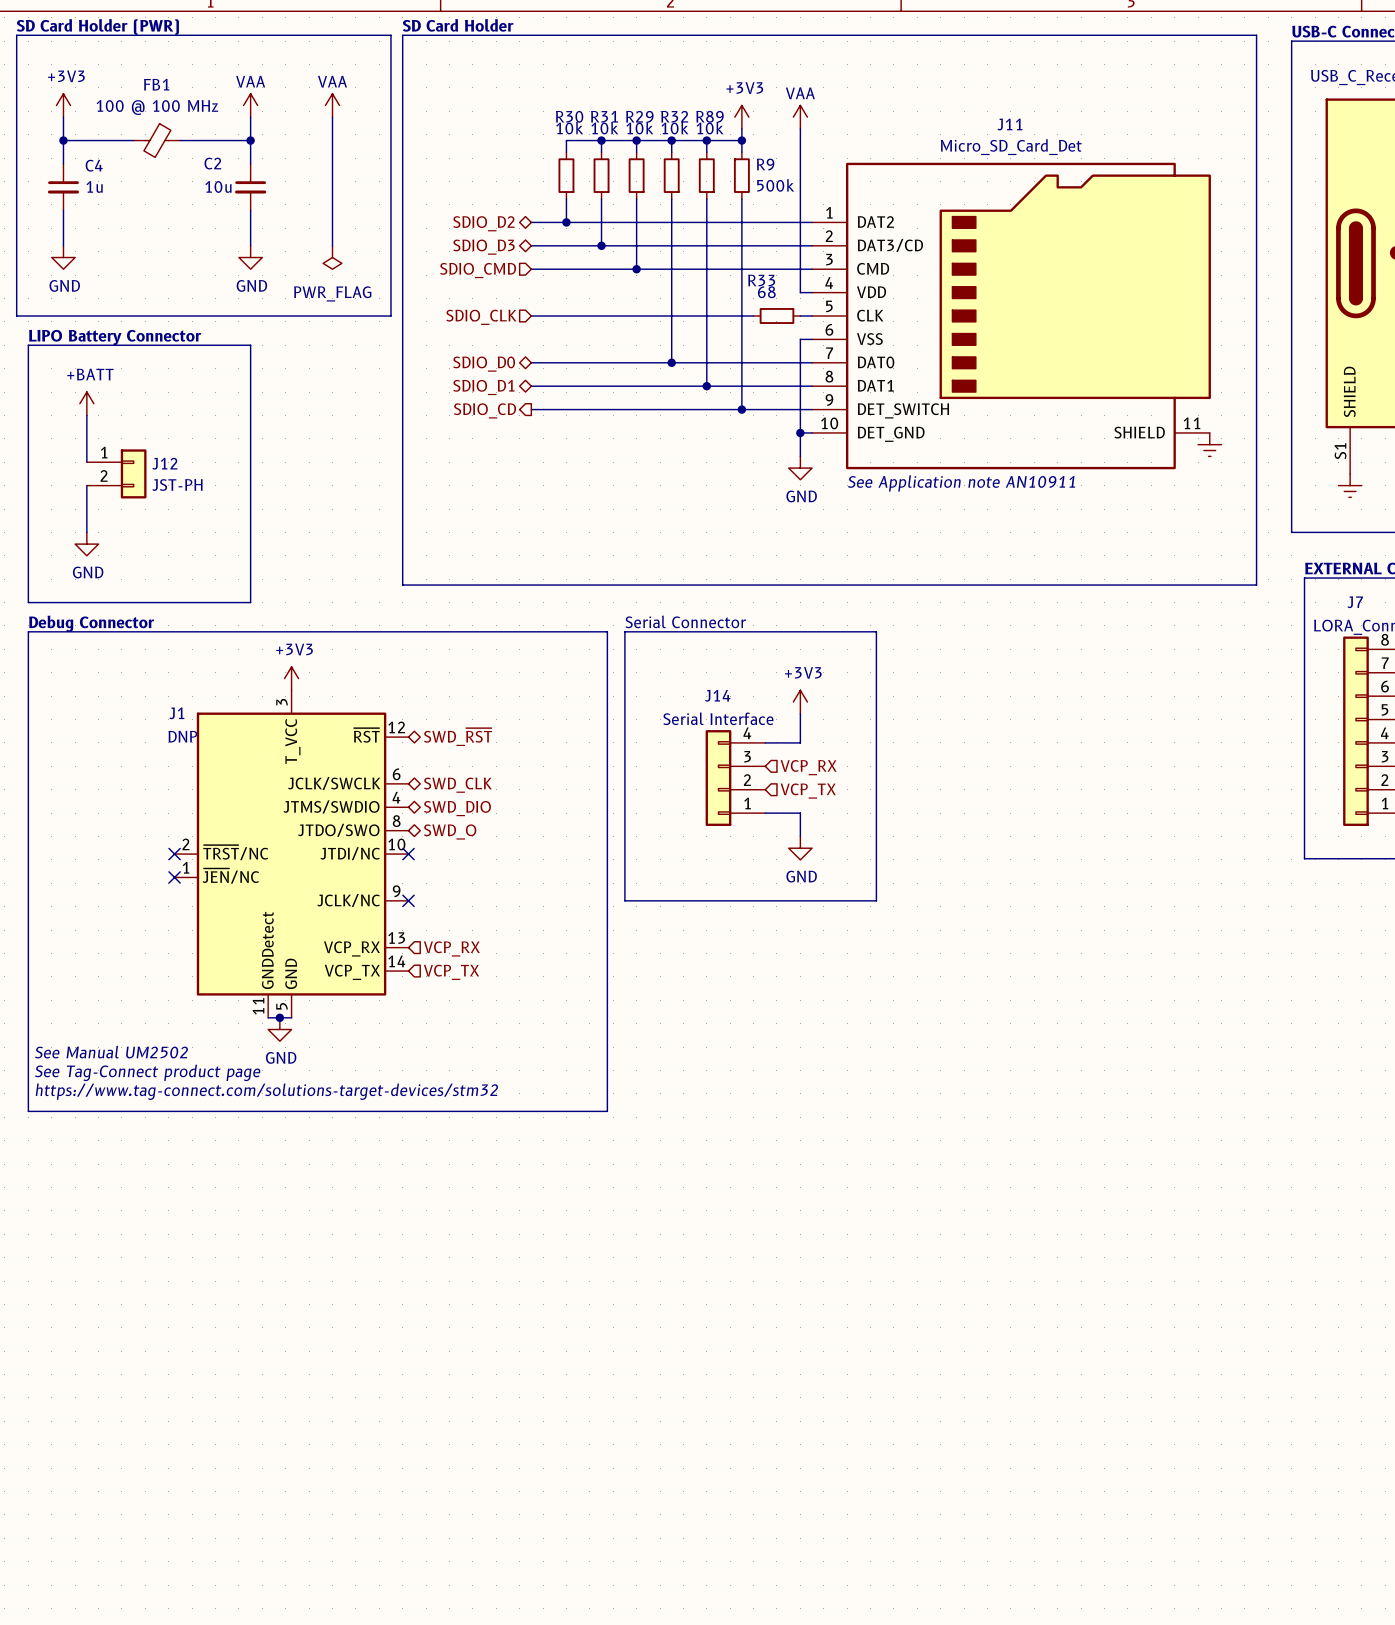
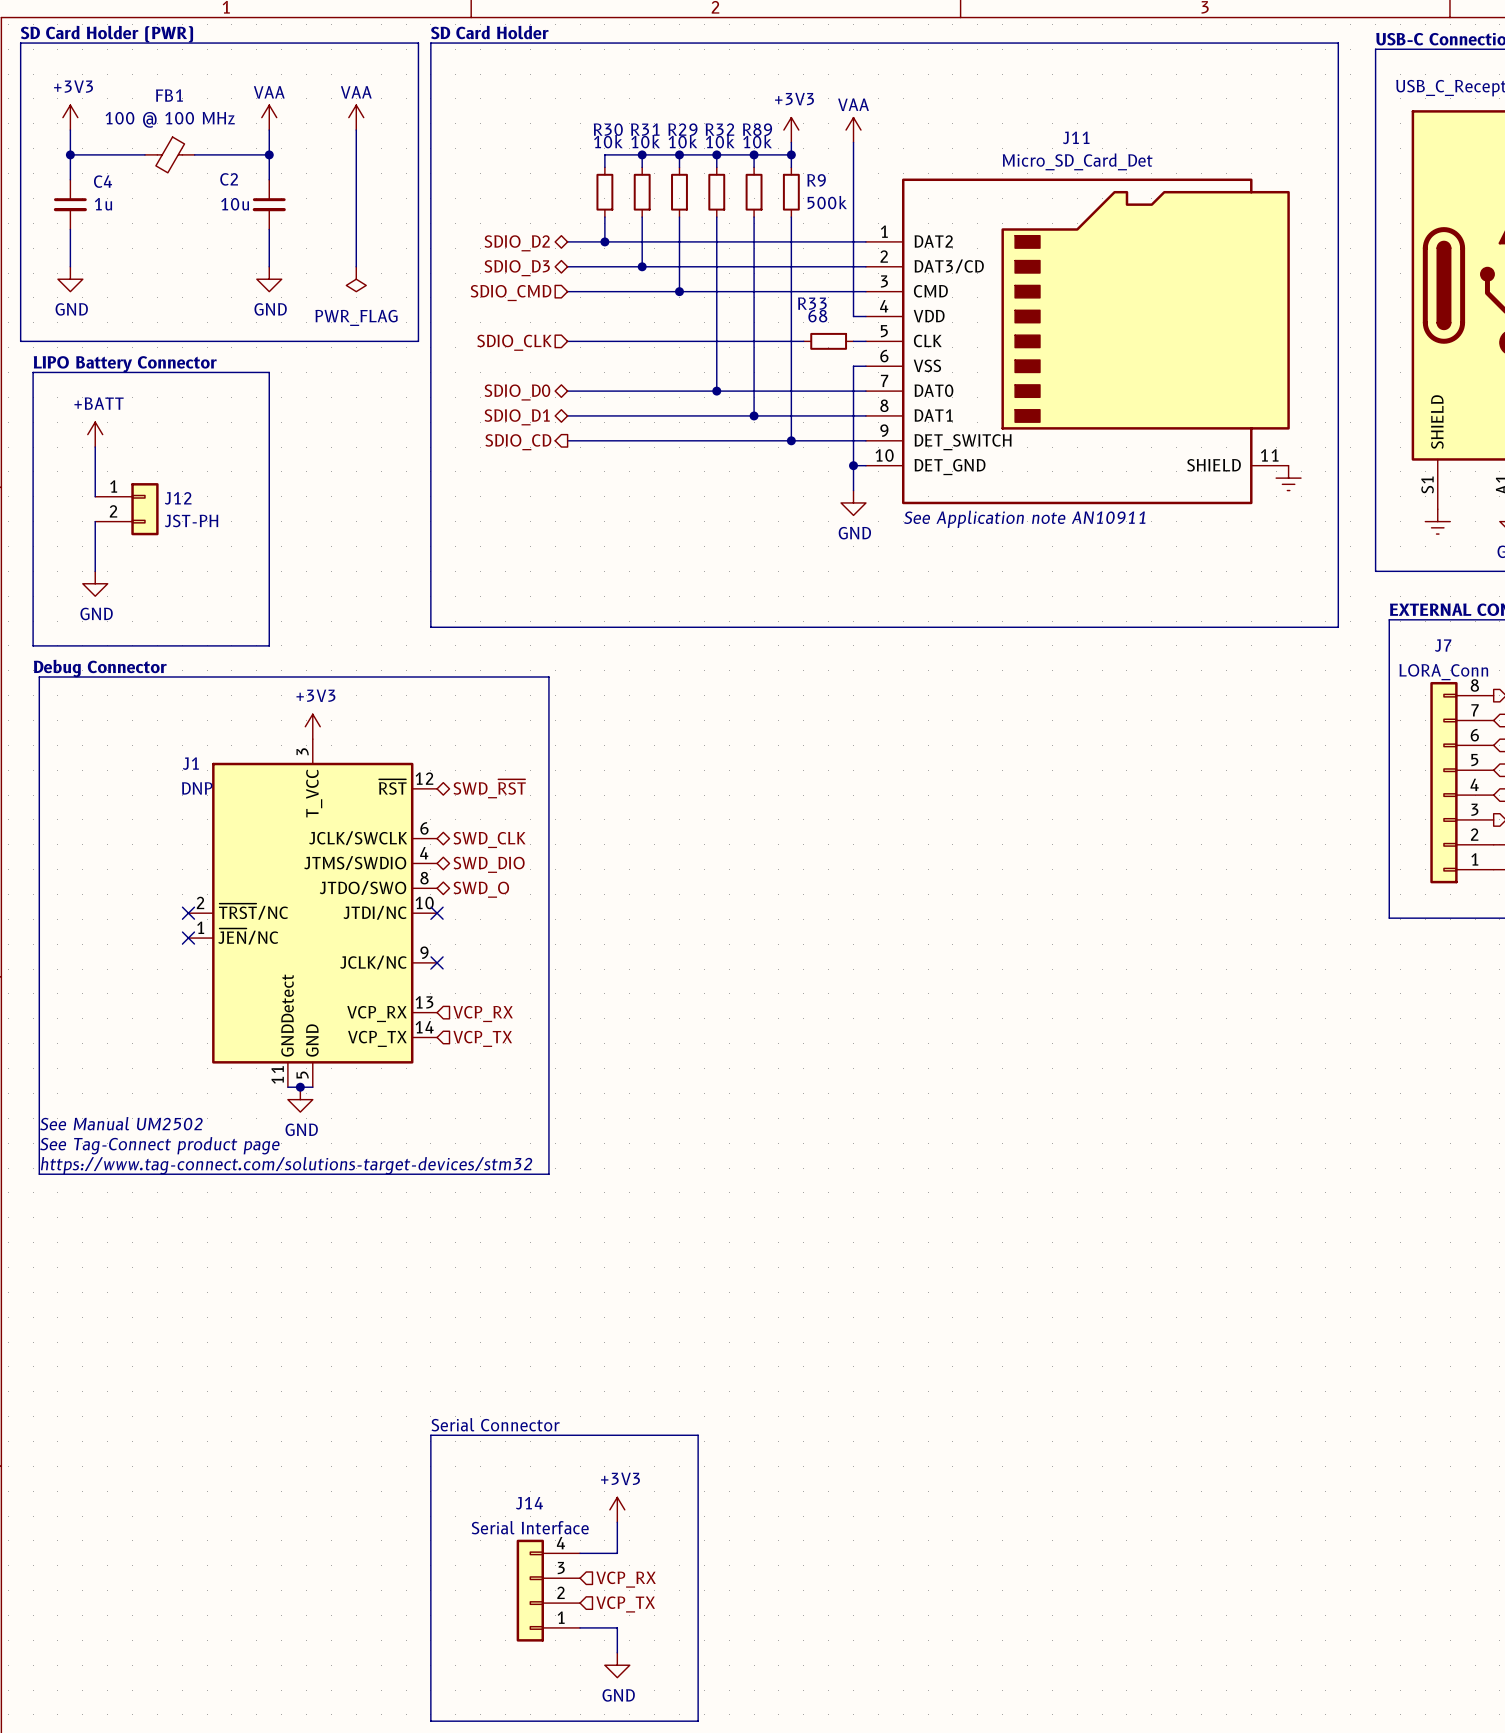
text: Serial Connector (685, 621) -> none
line: (34, 631) (28, 631) (28, 1111) (607, 1111) (607, 631) (513, 631) -> (39, 677) (39, 1174) (548, 1174) (548, 677)
line: (624, 631) (876, 631) (876, 900) (624, 900) (624, 631) -> none
power symbol: +3V3 (800, 702) -> none
wire: (800, 713) (800, 742) (765, 742) -> none
hierarchical label: VCP_RX (808, 767) -> none
J14 position: (735, 778) -> (548, 1590)
hierarchical label: VCP_TX (808, 791) -> none
wire: (765, 813) (800, 813) (800, 836) -> none
power symbol: GND (800, 848) -> none
text: none -> Serial Connector (495, 1424)
line: none -> (430, 1435) (698, 1435) (698, 1721) (430, 1721) (430, 1435)
power symbol: none -> +3V3 (617, 1509)
wire: none -> (617, 1522) (617, 1553) (580, 1553)
hierarchical label: none -> VCP_RX (626, 1579)
hierarchical label: none -> VCP_TX (625, 1604)
wire: none -> (580, 1627) (617, 1627) (617, 1652)
power symbol: none -> GND (617, 1665)

